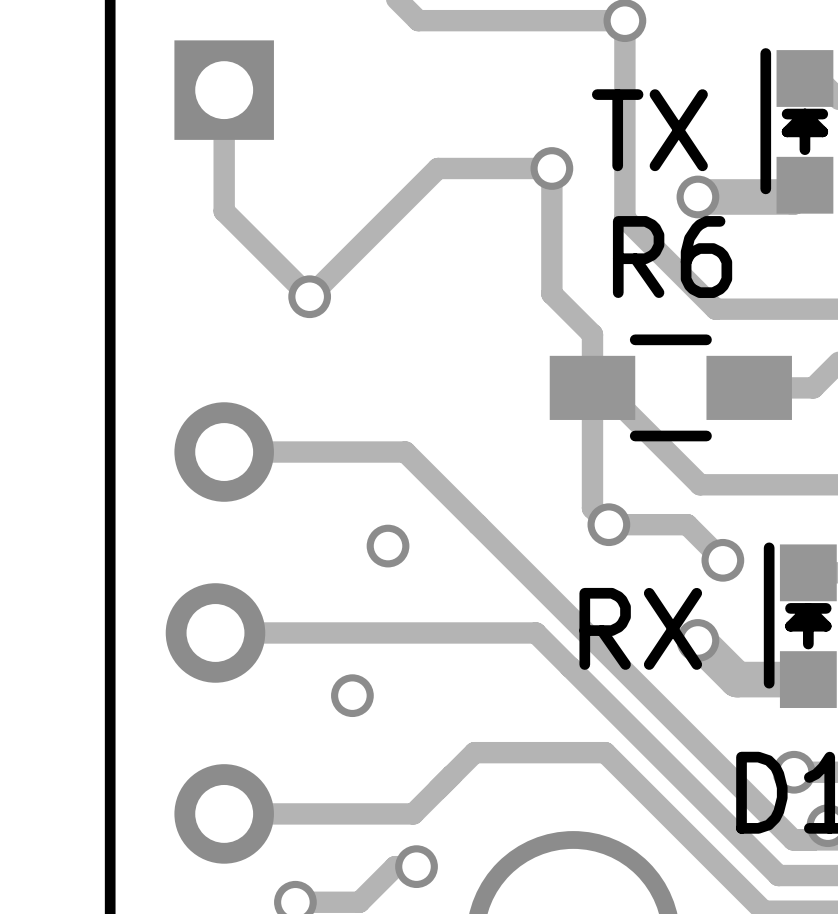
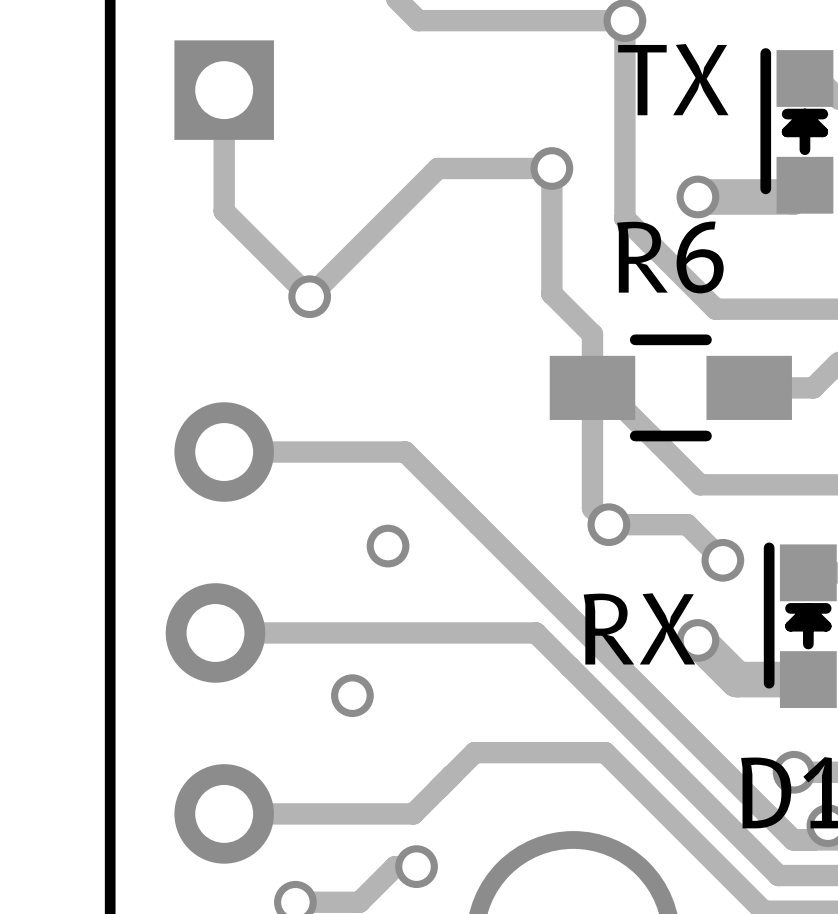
text position: TX (649, 130) -> TX (673, 79)

